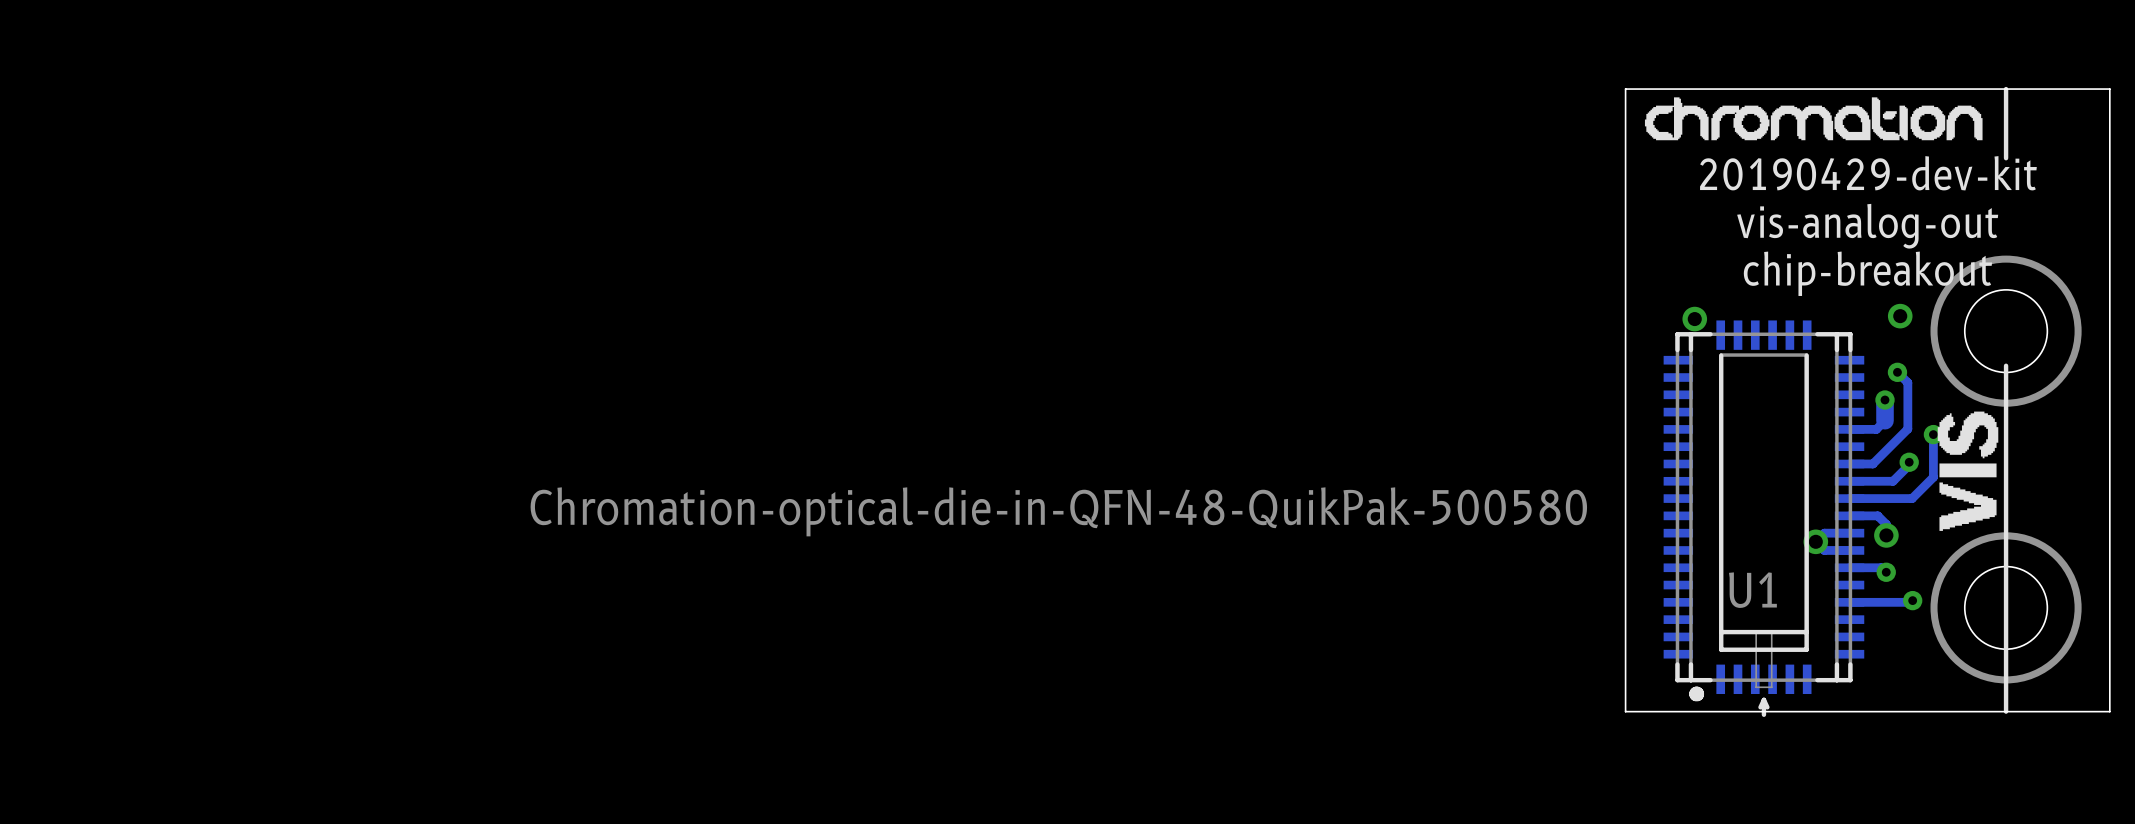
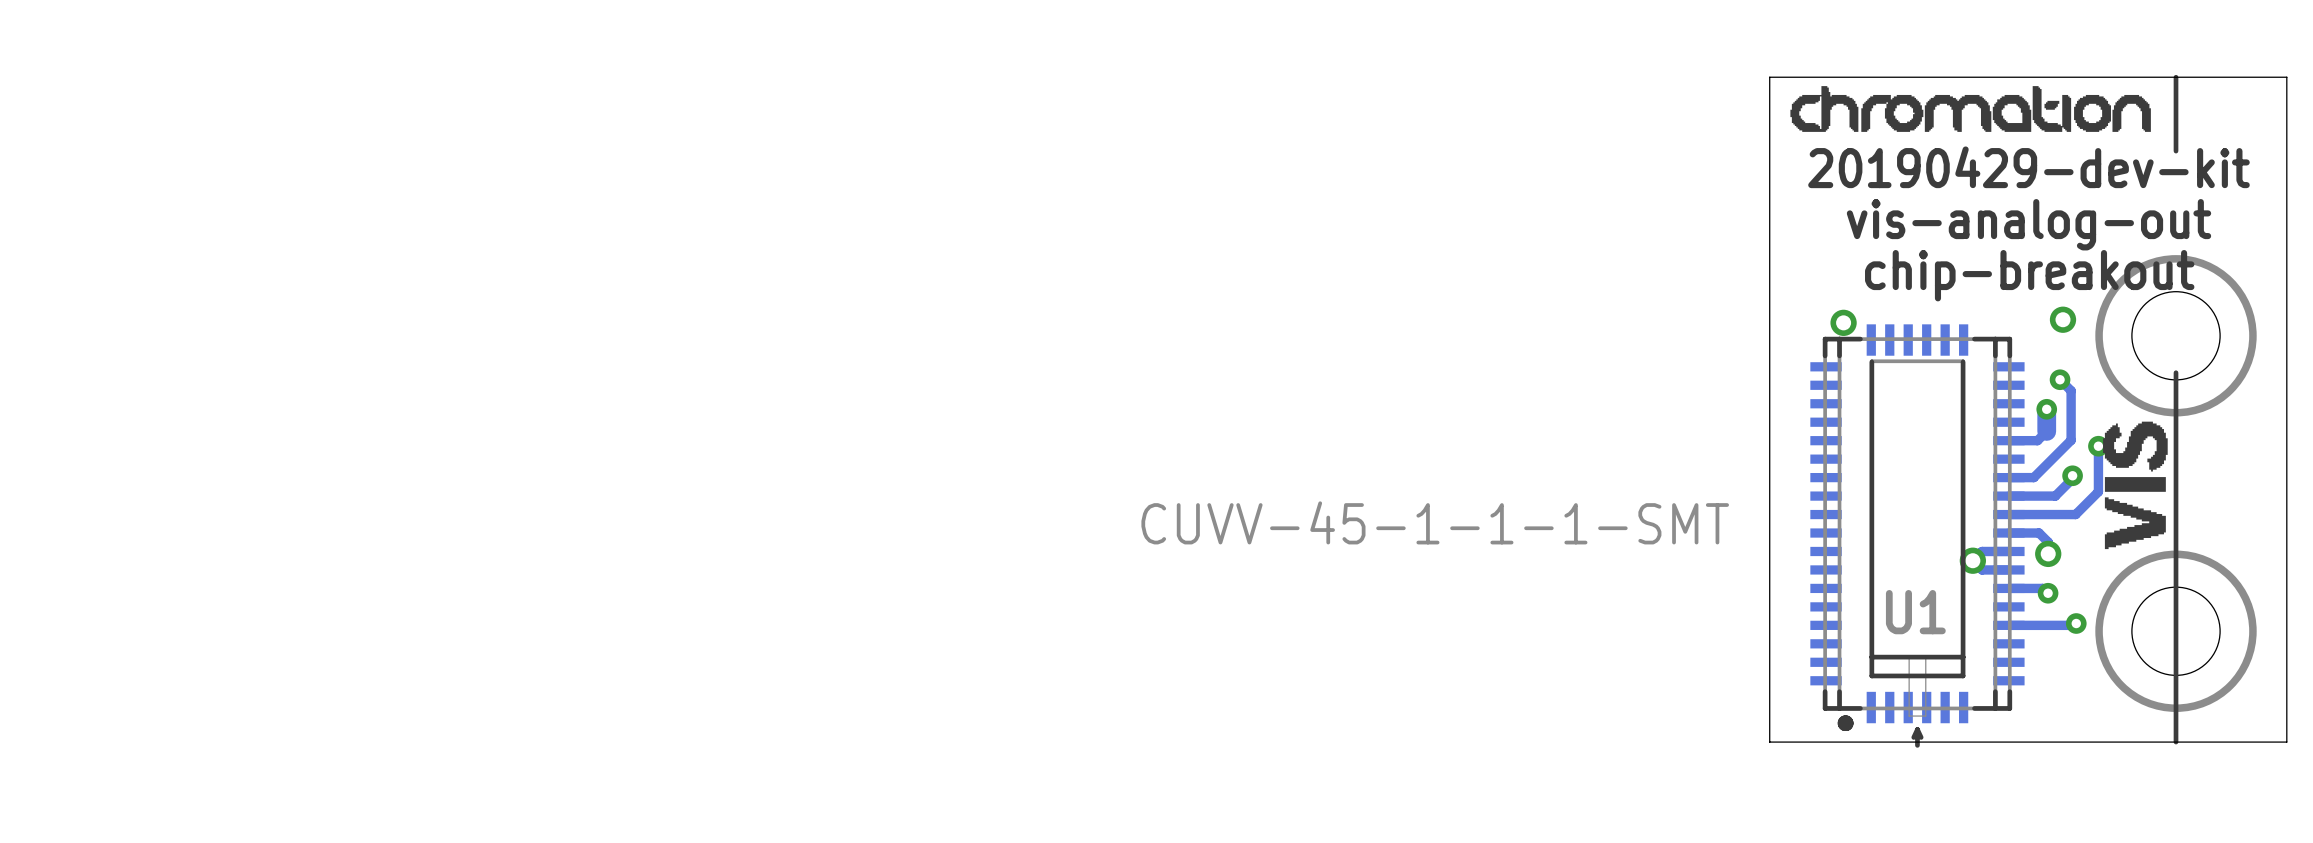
U1 value: Chromation-optical-die-in-QFN-48-QuikPak-500580 (1058, 511) -> CUVV-45-1-1-1-SMT (1435, 522)

